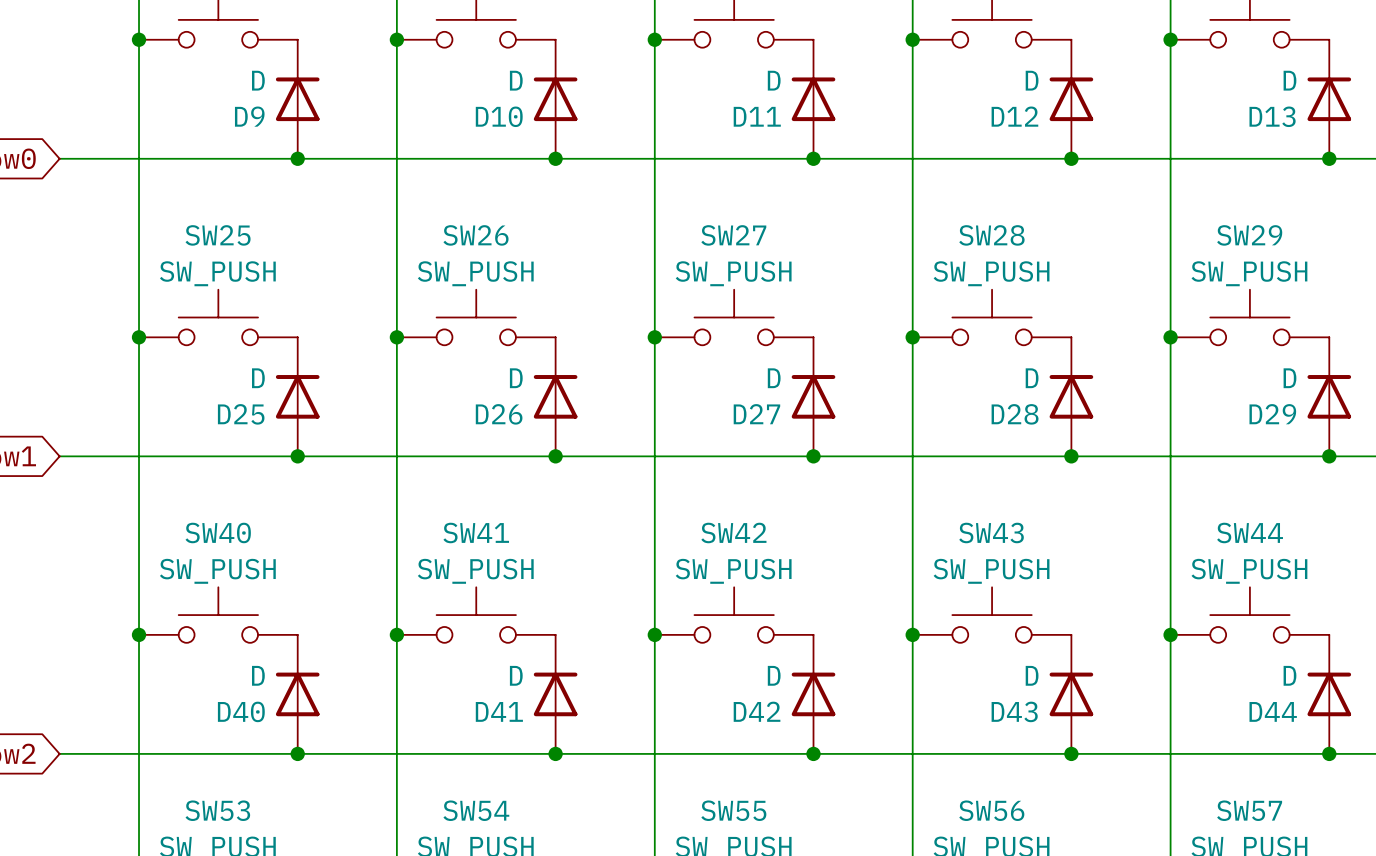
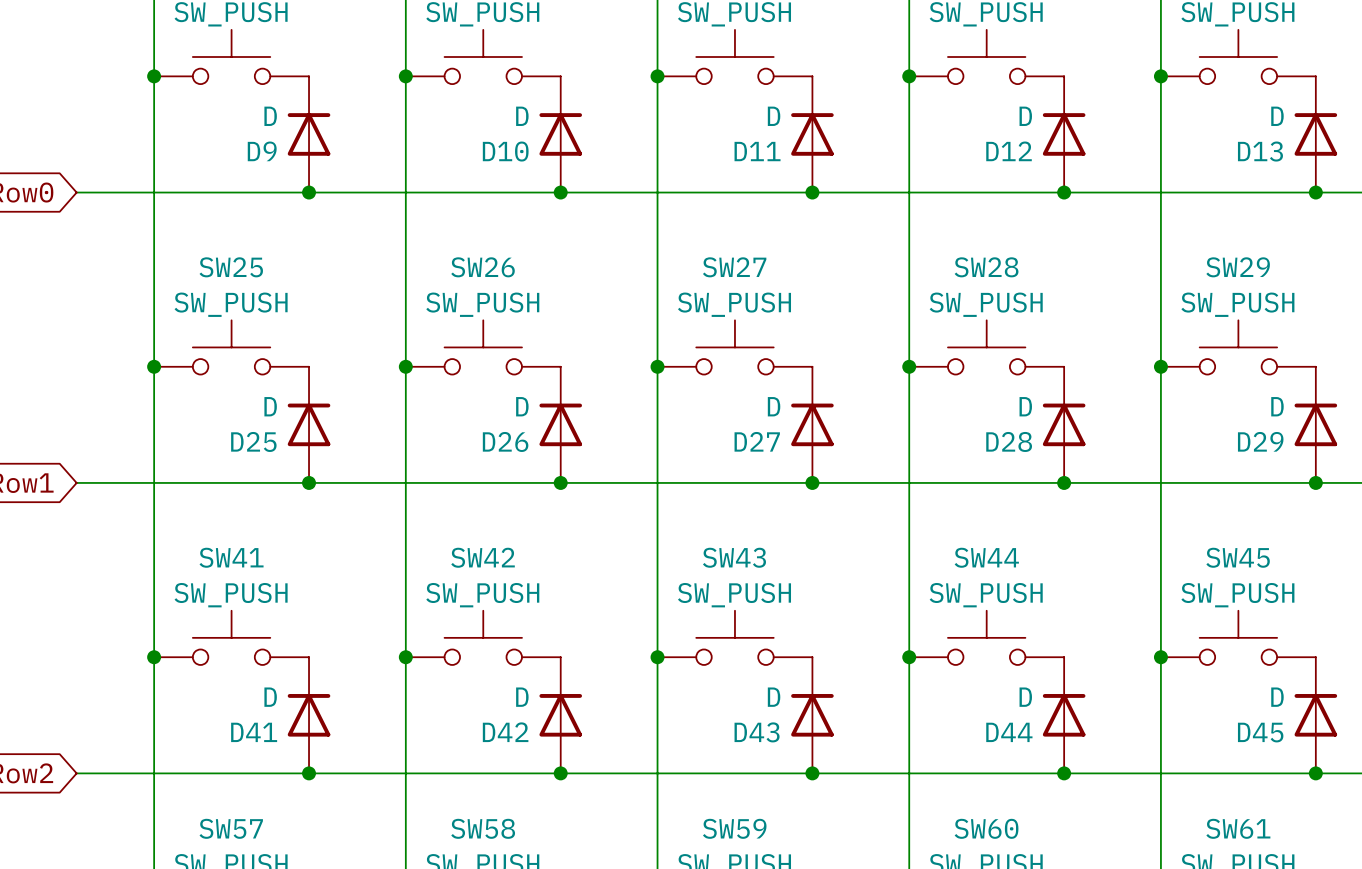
SW40 name: SW40 (218, 532) -> SW41 (231, 557)
SW41 name: SW41 (476, 532) -> SW42 (483, 557)
SW42 name: SW42 (733, 532) -> SW43 (734, 557)
SW43 name: SW43 (991, 532) -> SW44 (986, 557)
SW44 name: SW44 (1250, 532) -> SW45 (1238, 557)
D40 name: D40 (241, 711) -> D41 (254, 732)
D41 name: D41 (499, 711) -> D42 (505, 732)
D42 name: D42 (757, 711) -> D43 (757, 732)
D43 name: D43 (1014, 711) -> D44 (1009, 732)
D44 name: D44 (1273, 711) -> D45 (1260, 732)
SW53 name: SW53 (217, 810) -> SW57 (231, 828)
SW54 name: SW54 (476, 810) -> SW58 (483, 828)
SW55 name: SW55 (733, 810) -> SW59 (734, 828)
SW56 name: SW56 (991, 810) -> SW60 (986, 828)
SW57 name: SW57 (1249, 810) -> SW61 (1238, 828)

